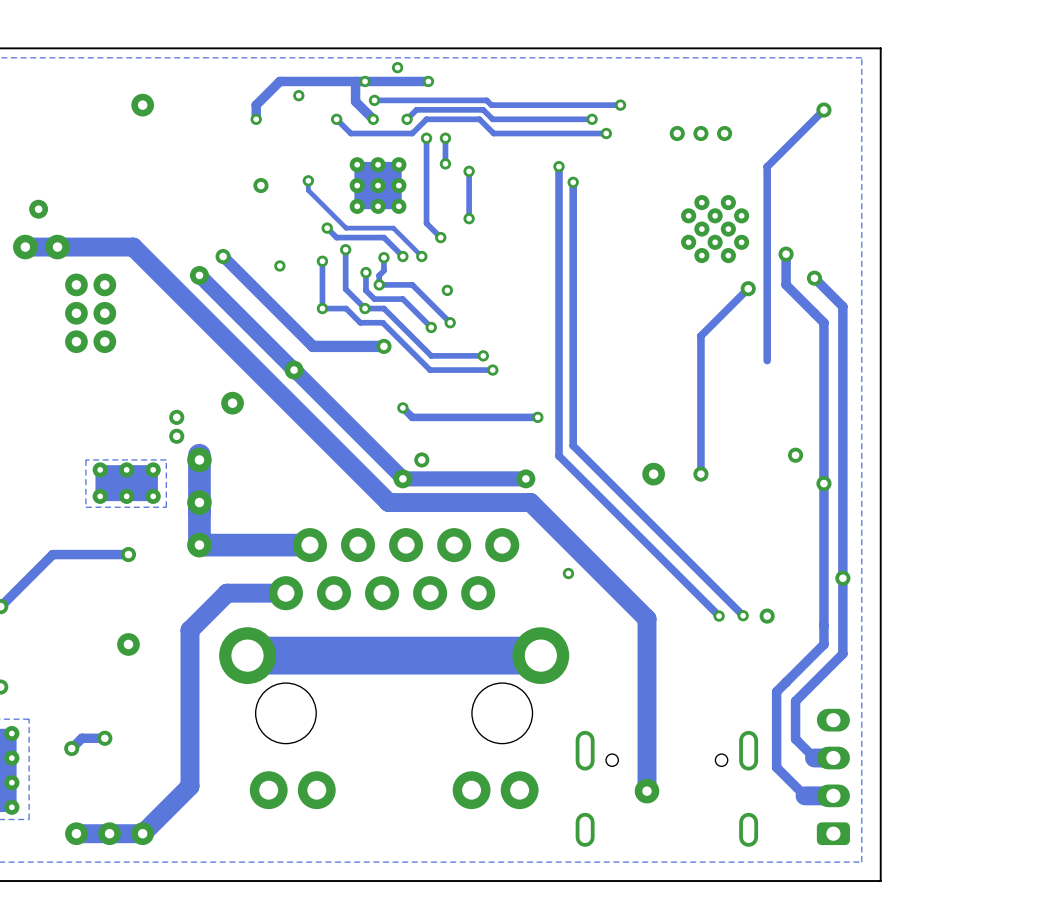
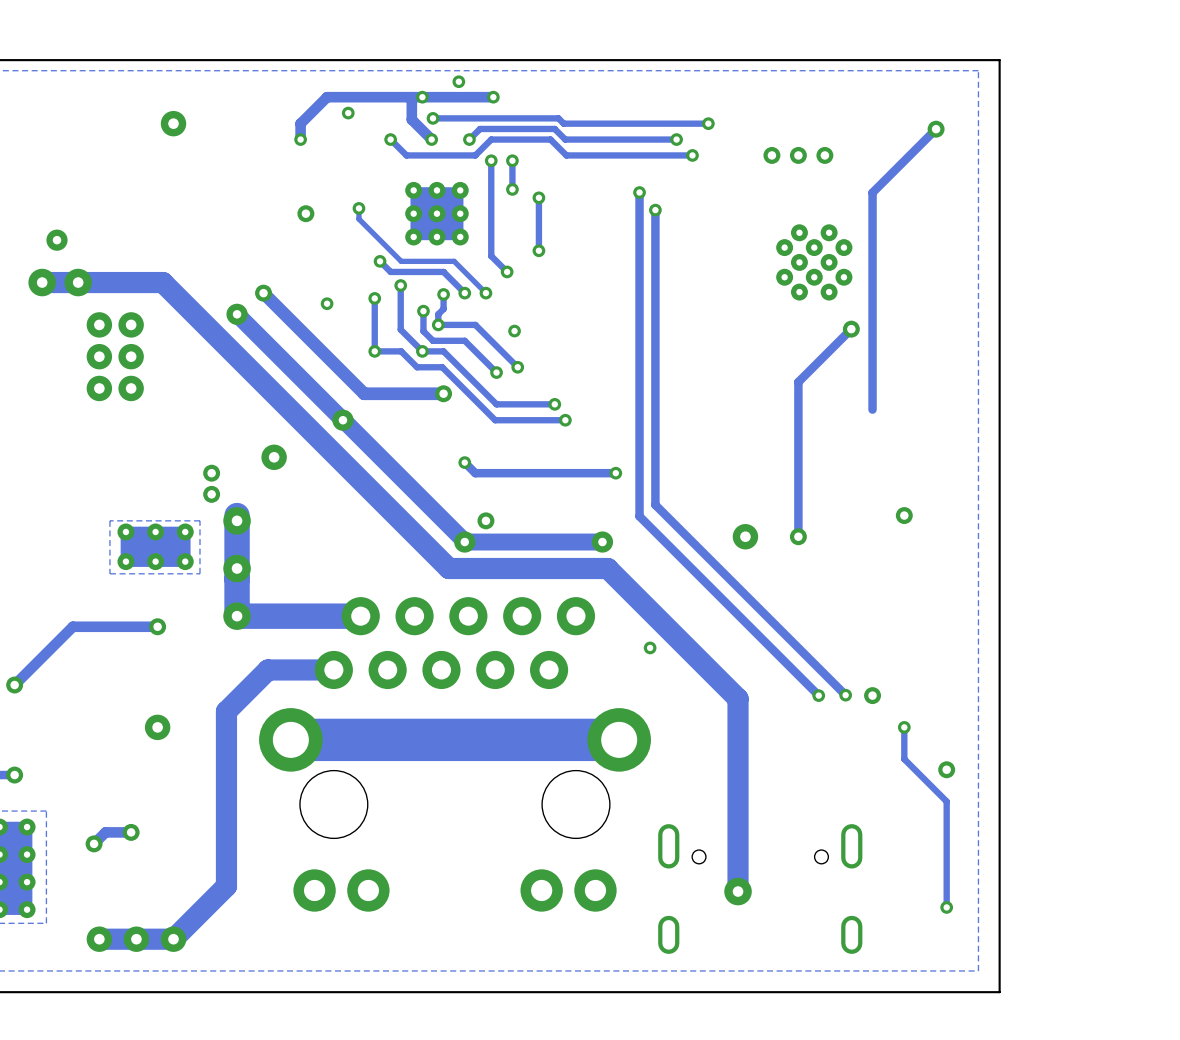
track: (786, 254) (786, 284) (823, 322) (823, 644) (776, 691) (776, 767) (805, 795) (833, 795) -> none
via: (786, 254) -> none
track: (814, 278) (842, 306) (842, 653) (795, 701) (795, 739) (814, 758) (833, 758) -> none
via: (814, 278) -> none
via: (823, 483) -> none
via: (842, 578) -> none
track: none -> (904, 727) (904, 759) (946, 801) (946, 907)
via: none -> (904, 727)
via: none -> (946, 769)
part: (833, 776) -> none
via: none -> (946, 907)

